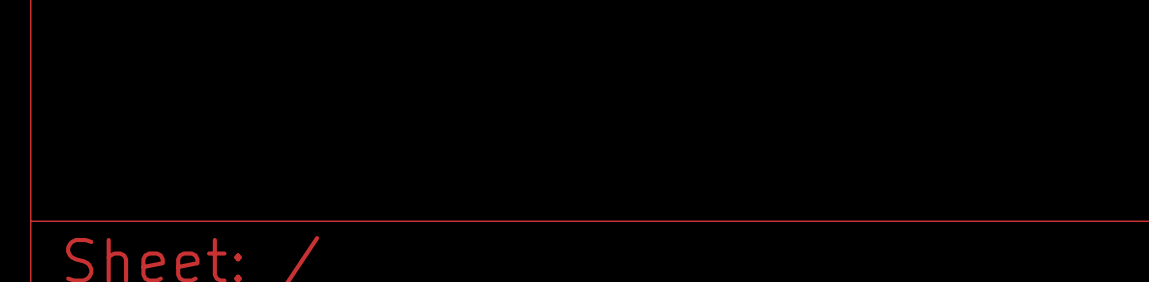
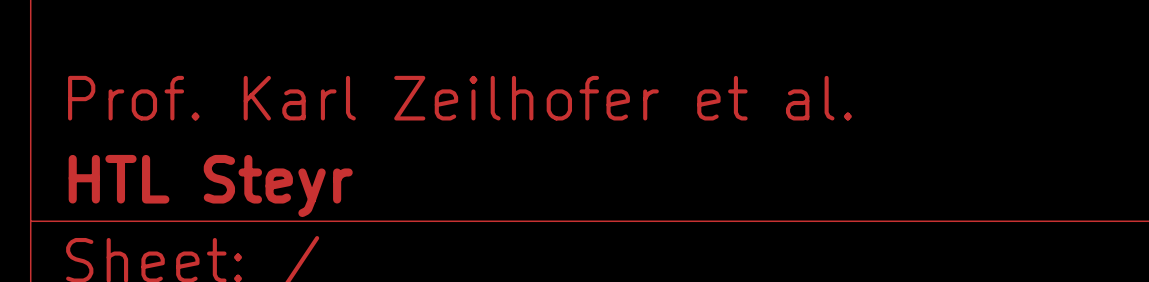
title block: none -> Prof. Karl Zeilhofer et al. (459, 98)
title block: none -> HTL Steyr (210, 185)

